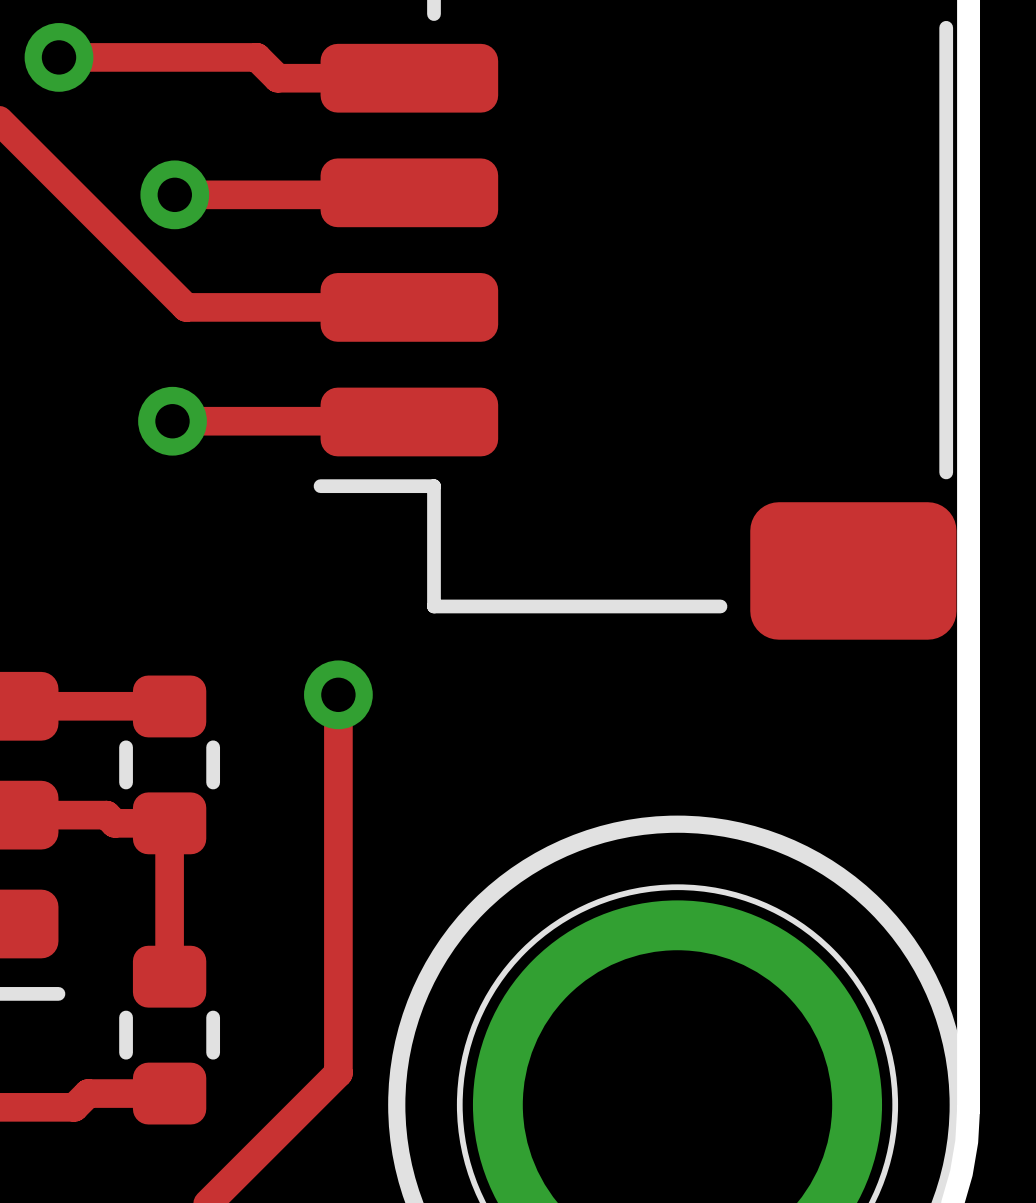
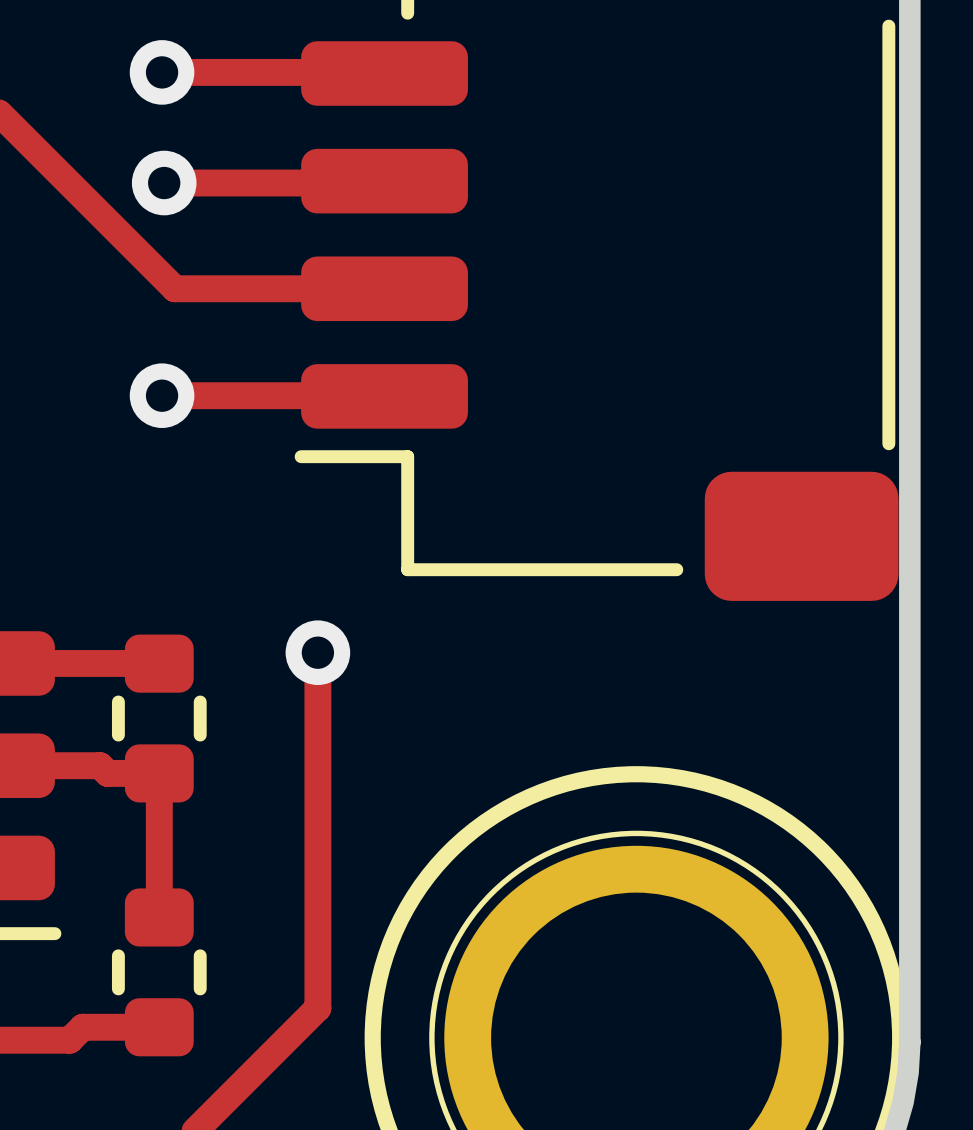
track: (59, 57) (256, 57) (277, 78) (397, 78) -> (162, 72) (372, 72)
via: (59, 57) -> none
via: none -> (162, 72)

